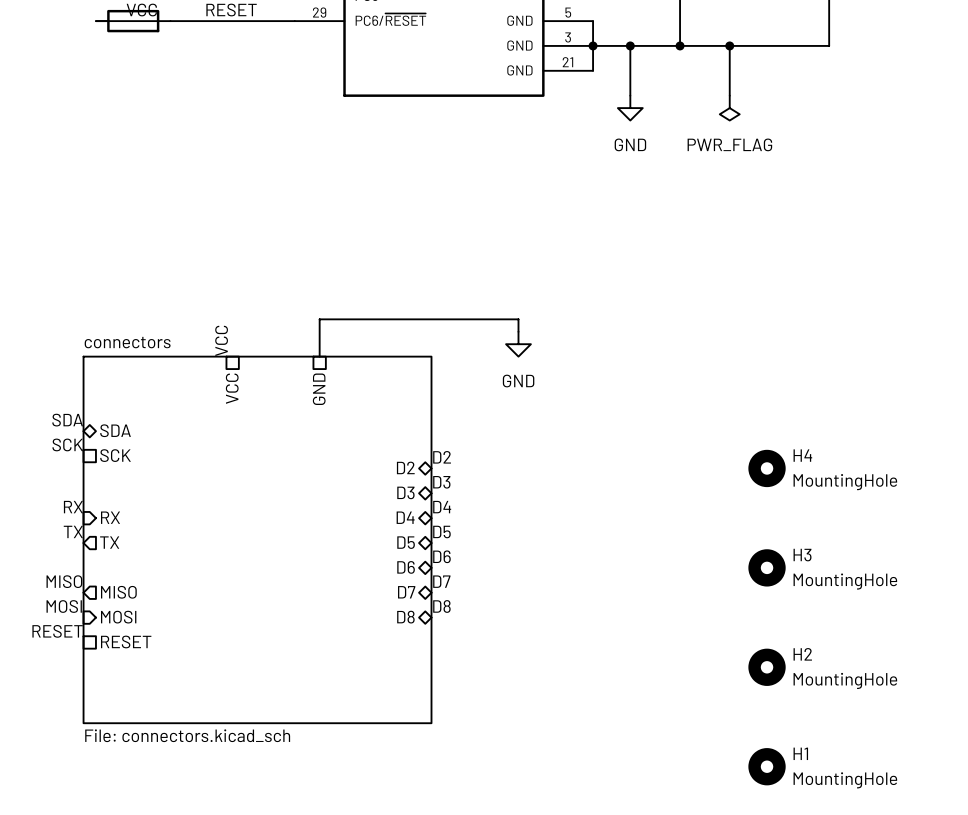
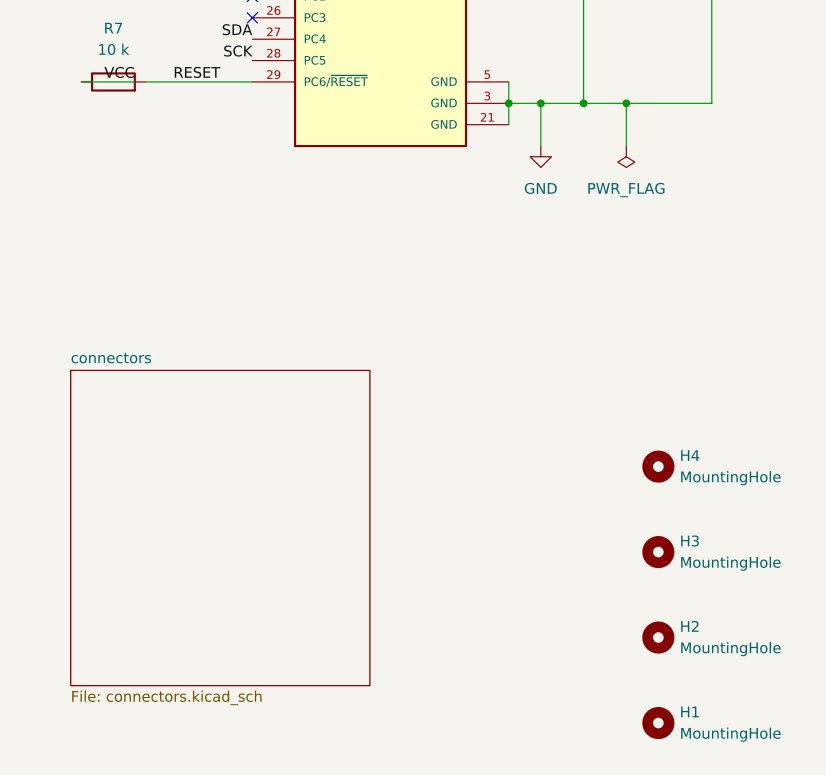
wire: (518, 331) (518, 319) (319, 319) (319, 356) -> none
label: VCC (221, 340) -> none
power symbol: GND (518, 344) -> none
sheet pin: VCC (232, 388) -> none
sheet pin: GND (319, 389) -> none
label: SDA (67, 420) -> none
sheet pin: SDA (115, 430) -> none
label: SCK (67, 444) -> none
sheet pin: SCK (115, 455) -> none
label: D2 (442, 457) -> none
sheet pin: D2 (405, 467) -> none
label: D3 (441, 482) -> none
sheet pin: D3 (405, 492) -> none
label: RX (73, 507) -> none
label: D4 (442, 507) -> none
sheet pin: RX (110, 517) -> none
sheet pin: D4 (405, 517) -> none
label: TX (73, 531) -> none
label: D5 (441, 532) -> none
sheet pin: TX (109, 542) -> none
sheet pin: D5 (406, 542) -> none
label: D6 (441, 556) -> none
sheet pin: D6 (406, 567) -> none
label: MISO (64, 581) -> none
label: D7 (441, 581) -> none
sheet pin: MISO (118, 592) -> none
sheet pin: D7 (406, 592) -> none
label: MOSI (64, 606) -> none
label: D8 (441, 606) -> none
sheet pin: MOSI (118, 617) -> none
sheet pin: D8 (405, 617) -> none
label: RESET (57, 631) -> none
sheet pin: RESET (126, 641) -> none

